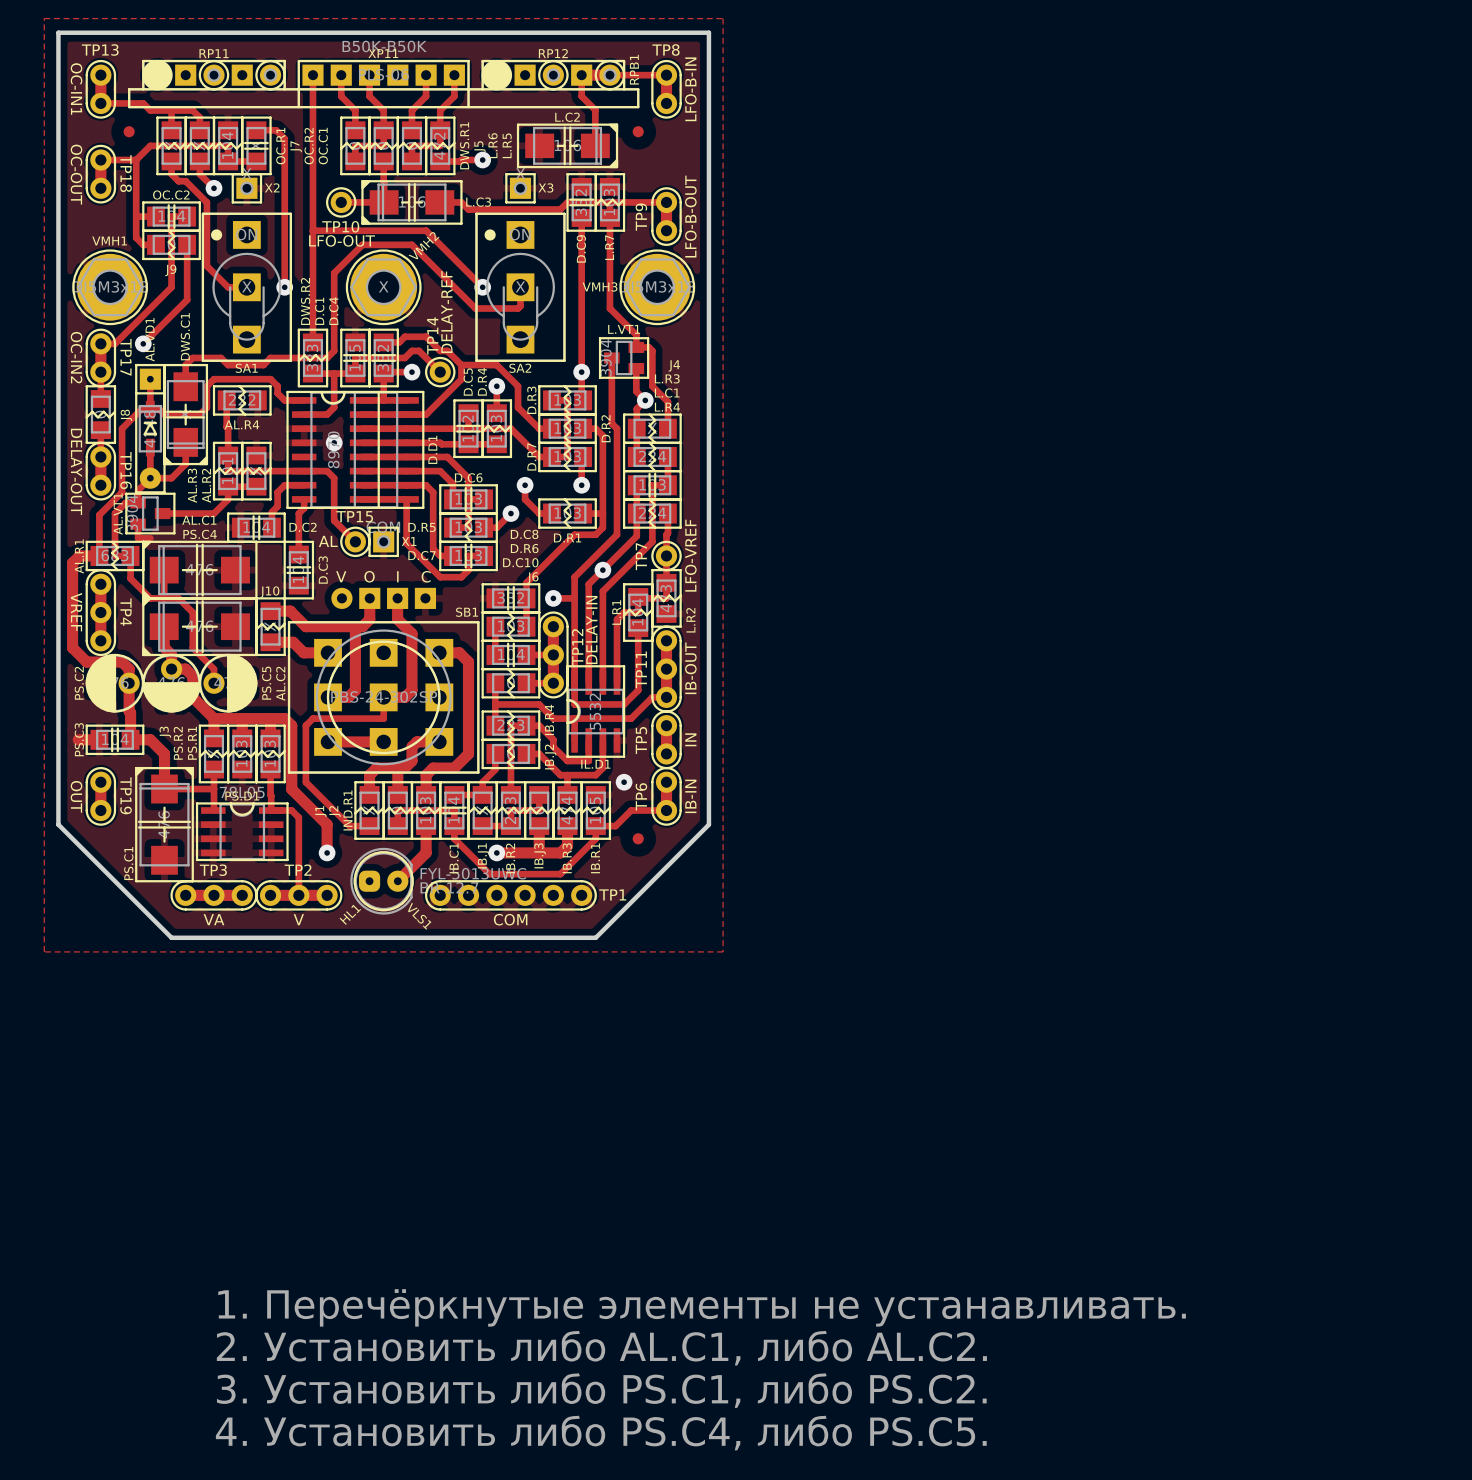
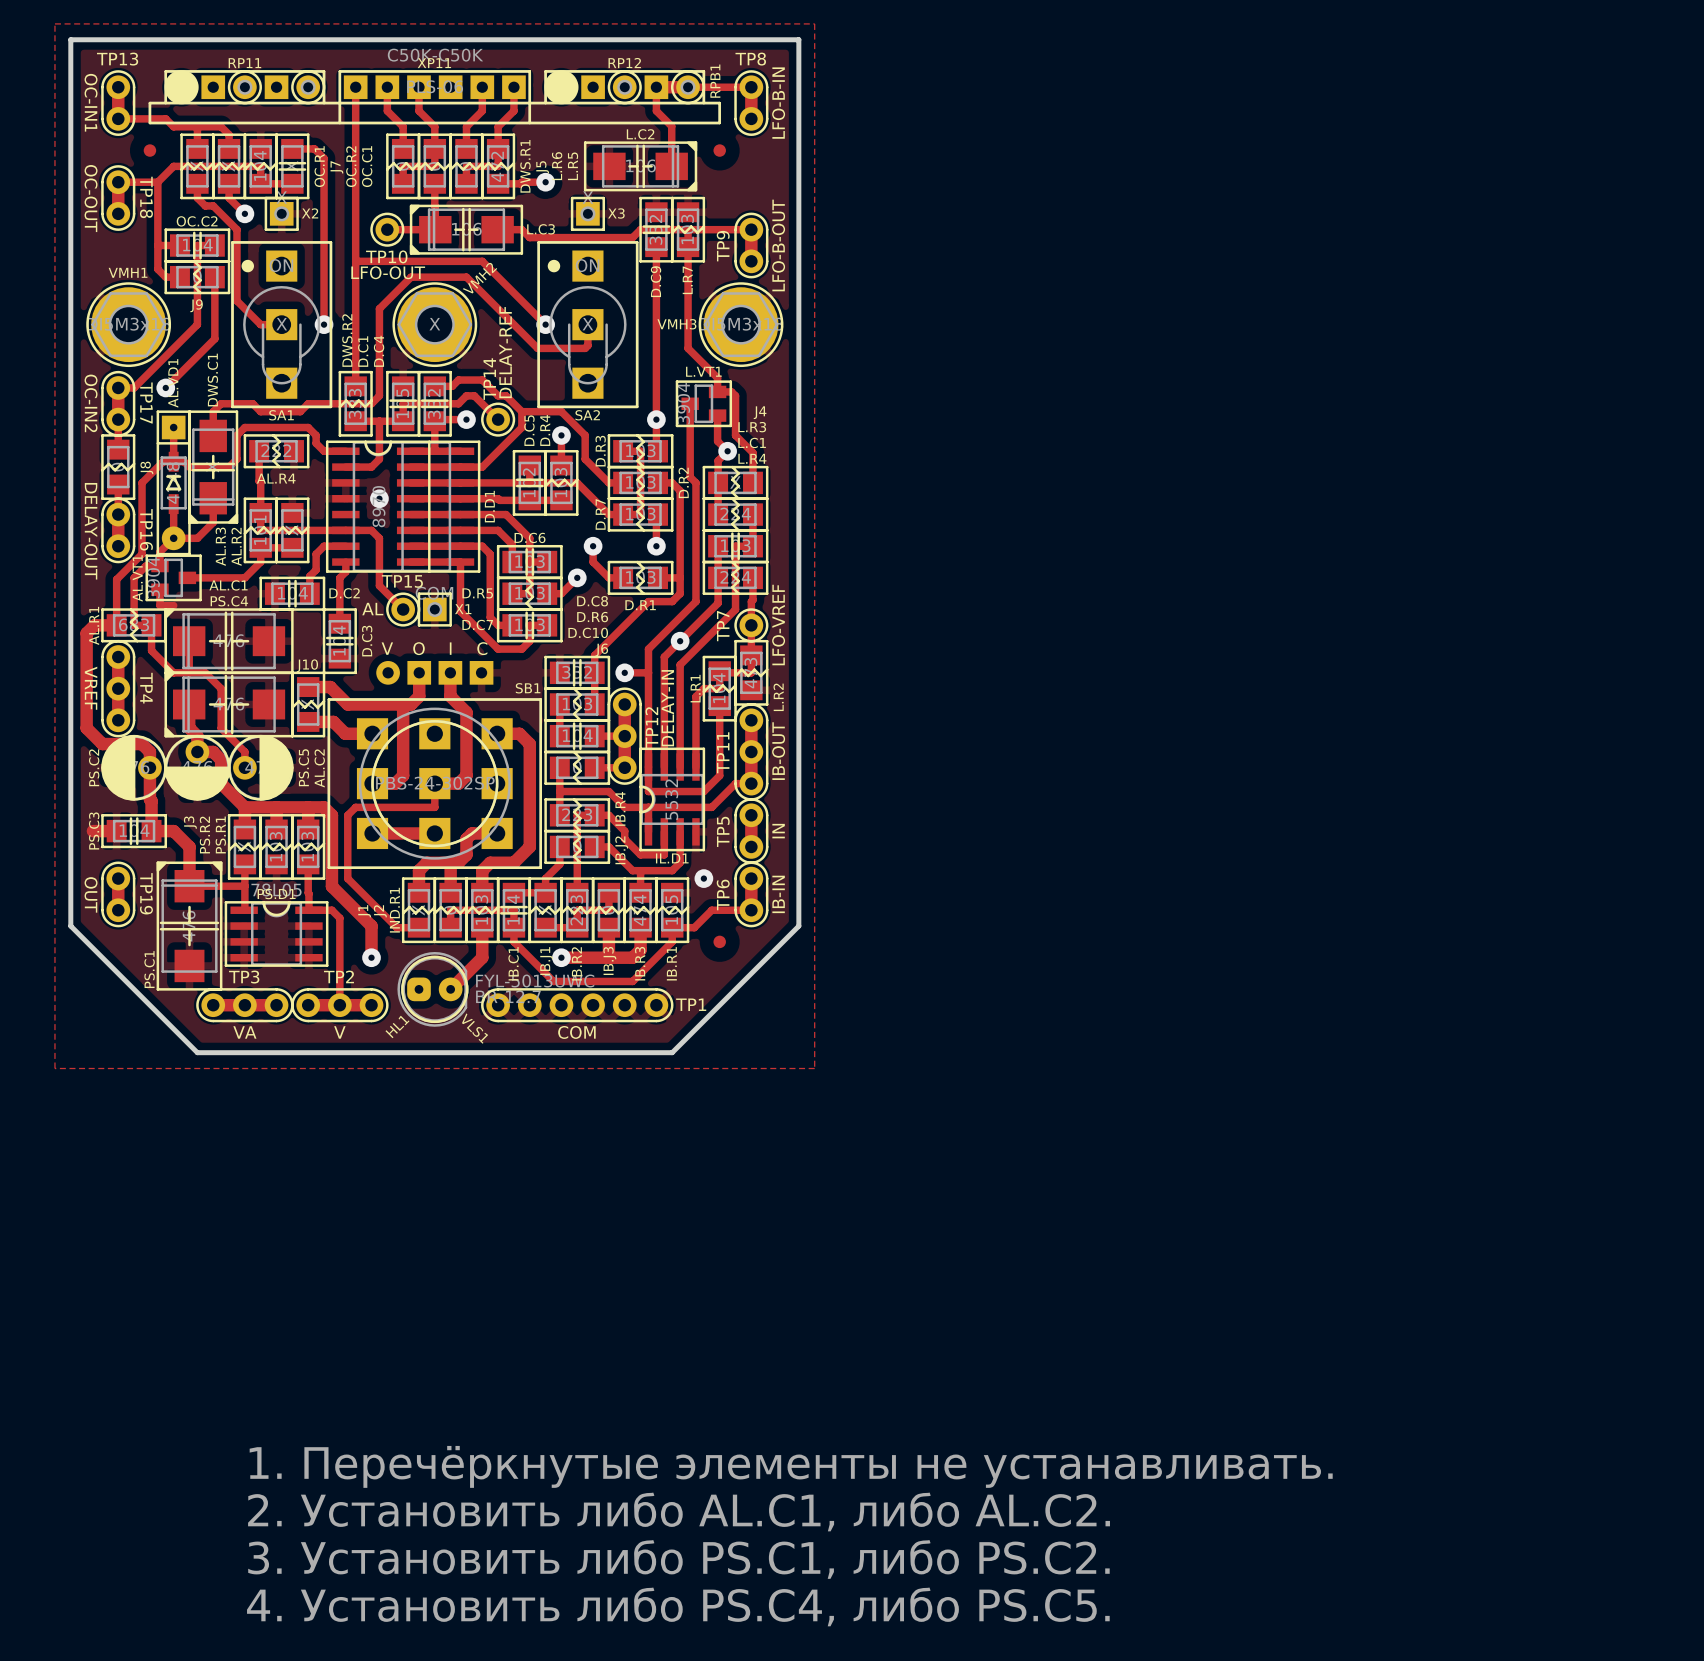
RPB1 value: B50K-B50K (384, 46) -> C50K-C50K (435, 55)

